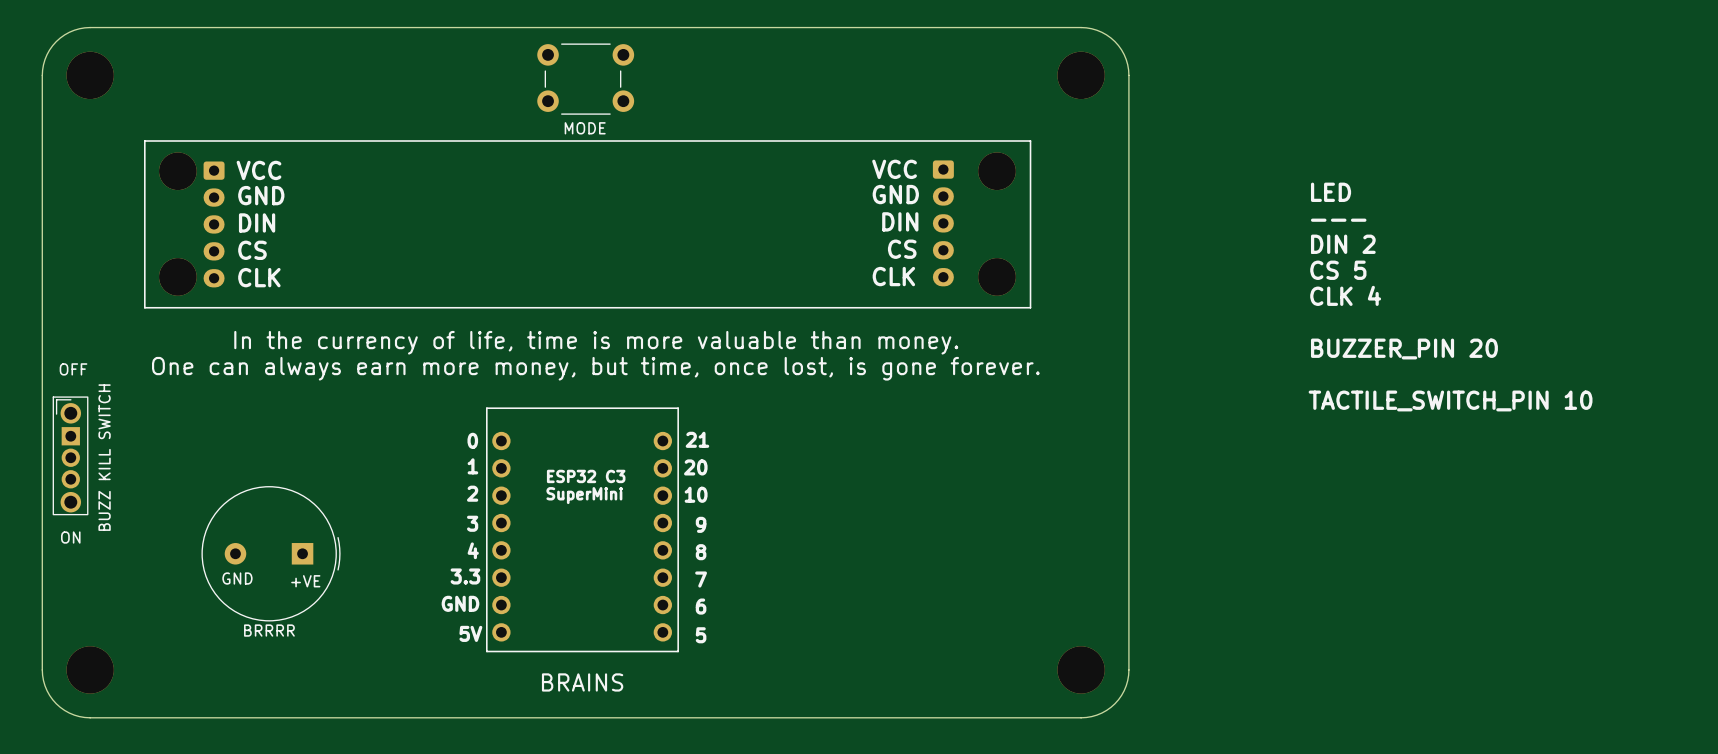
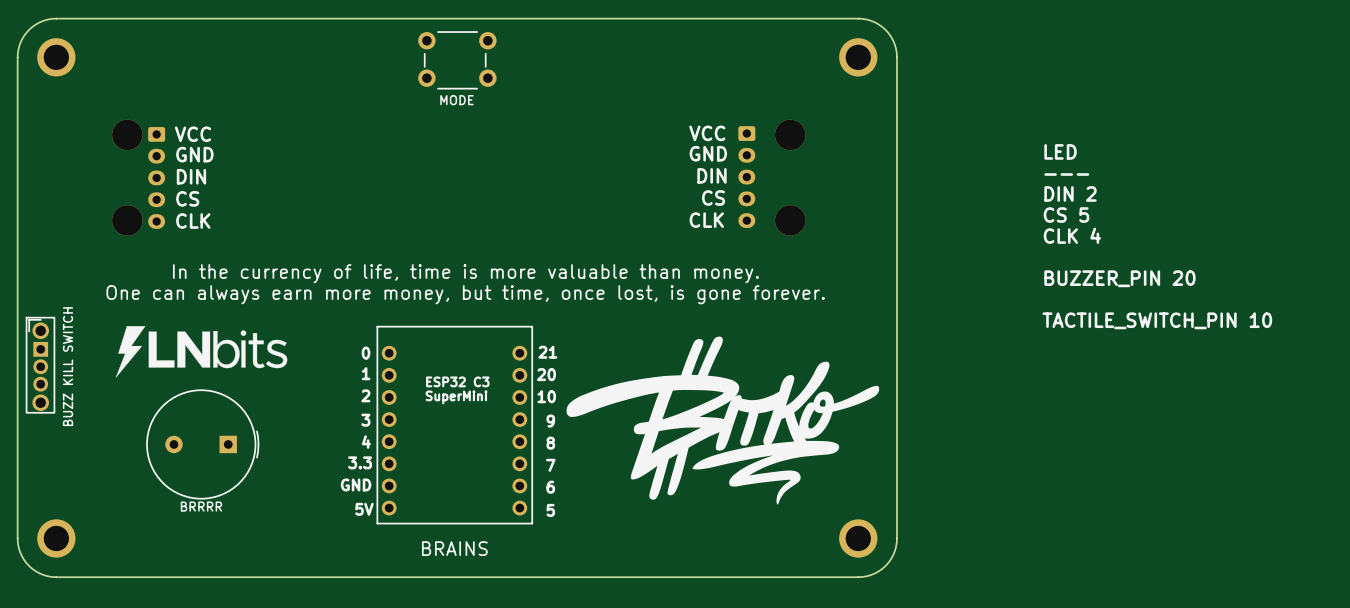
part footprint: [66, 51, 114, 100] -> [37, 38, 76, 77]
part footprint: [1057, 51, 1105, 100] -> [839, 38, 878, 77]
line: (144, 141) (1030, 141) (1030, 307) (144, 307) (144, 141) -> none
text: OFF (73, 369) -> none
drawing: none -> [115, 326, 288, 378]
drawing: none -> [566, 336, 880, 505]
text: ON (70, 537) -> none
text: GND (237, 578) -> none
text: +VE (305, 581) -> none
part footprint: [66, 646, 114, 694] -> [37, 519, 76, 558]
part footprint: [1057, 646, 1105, 694] -> [839, 519, 878, 558]

